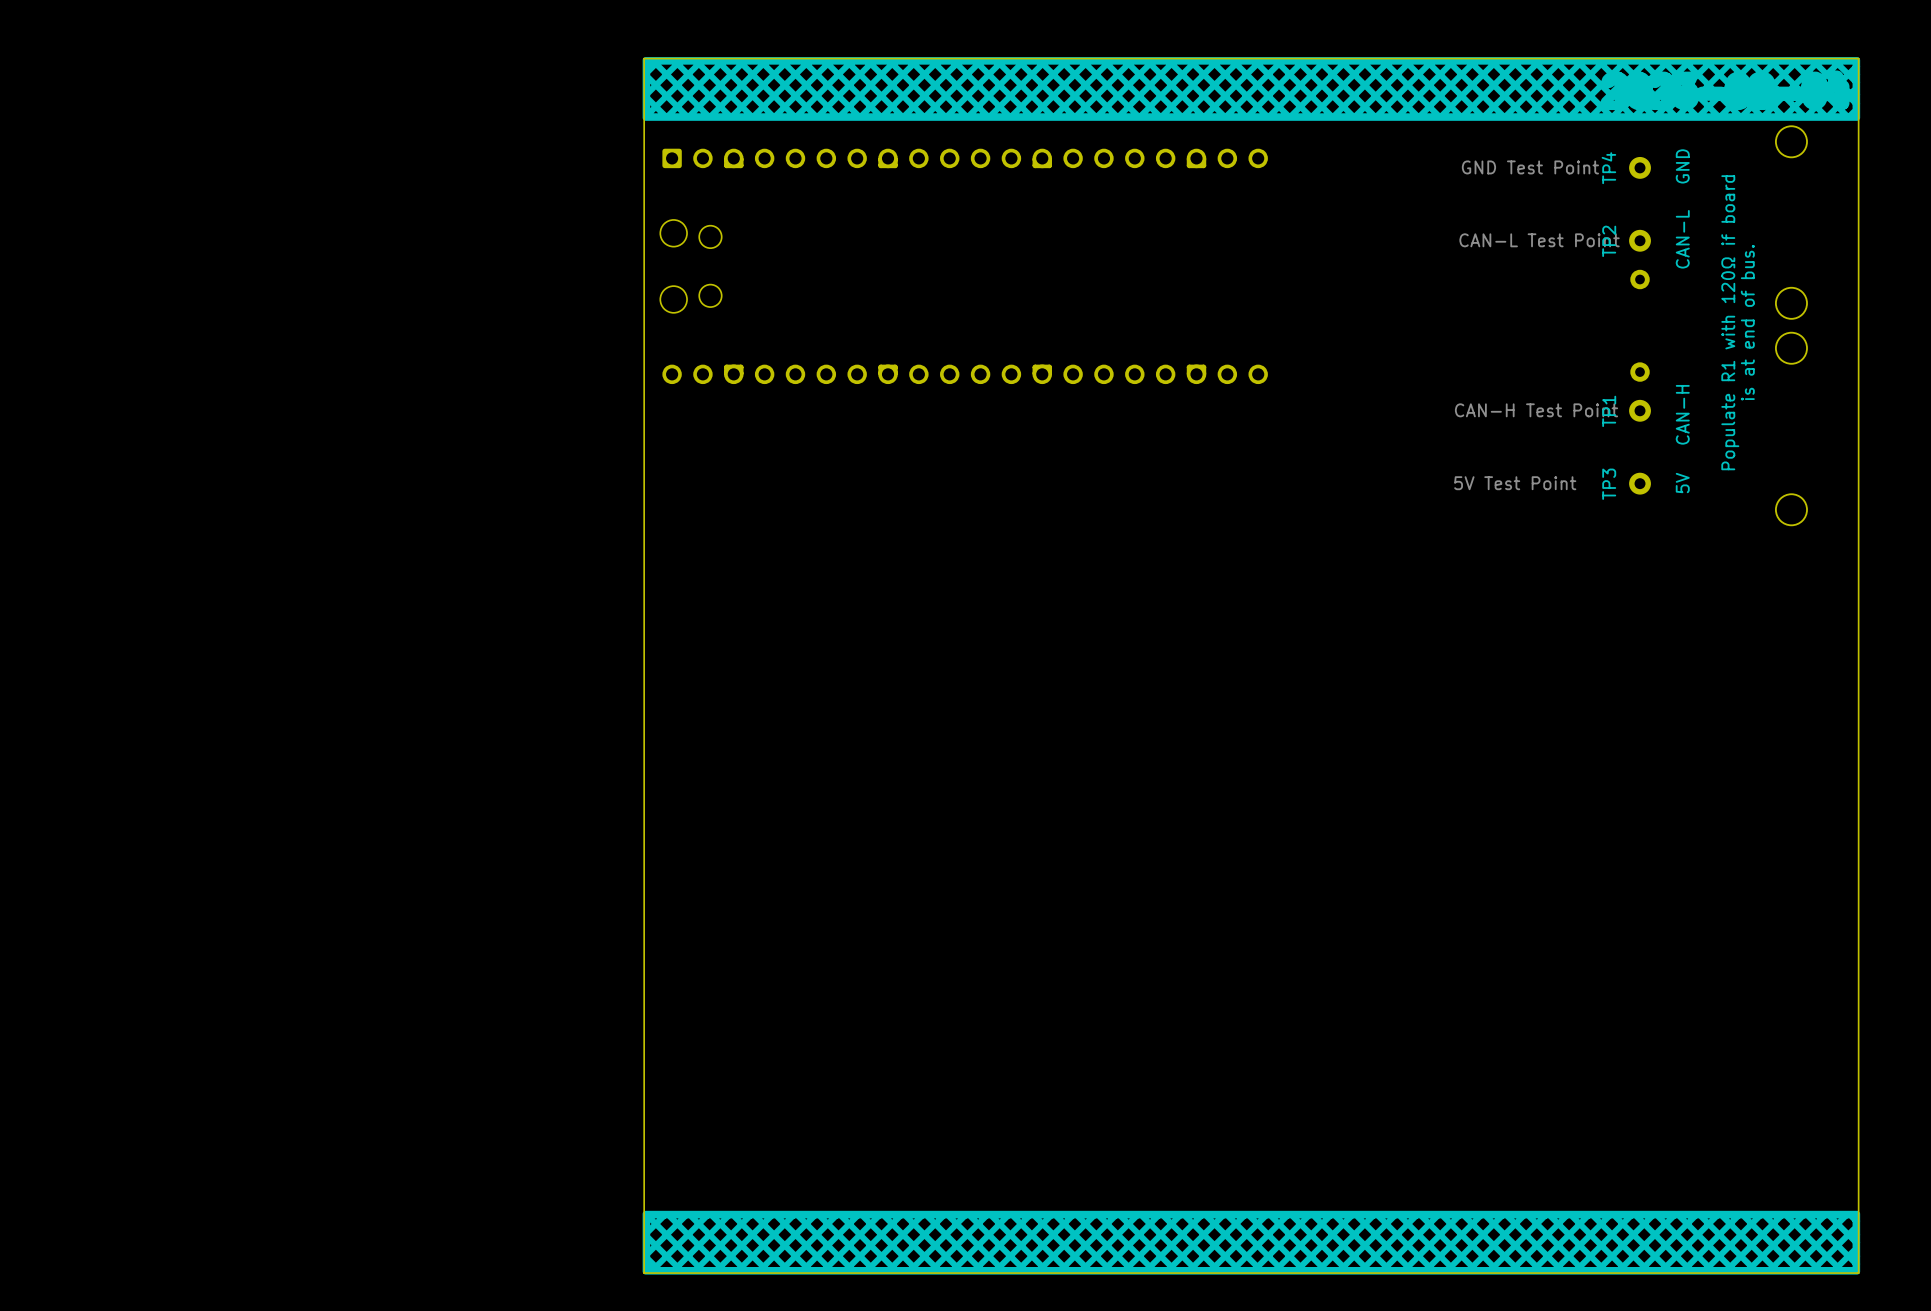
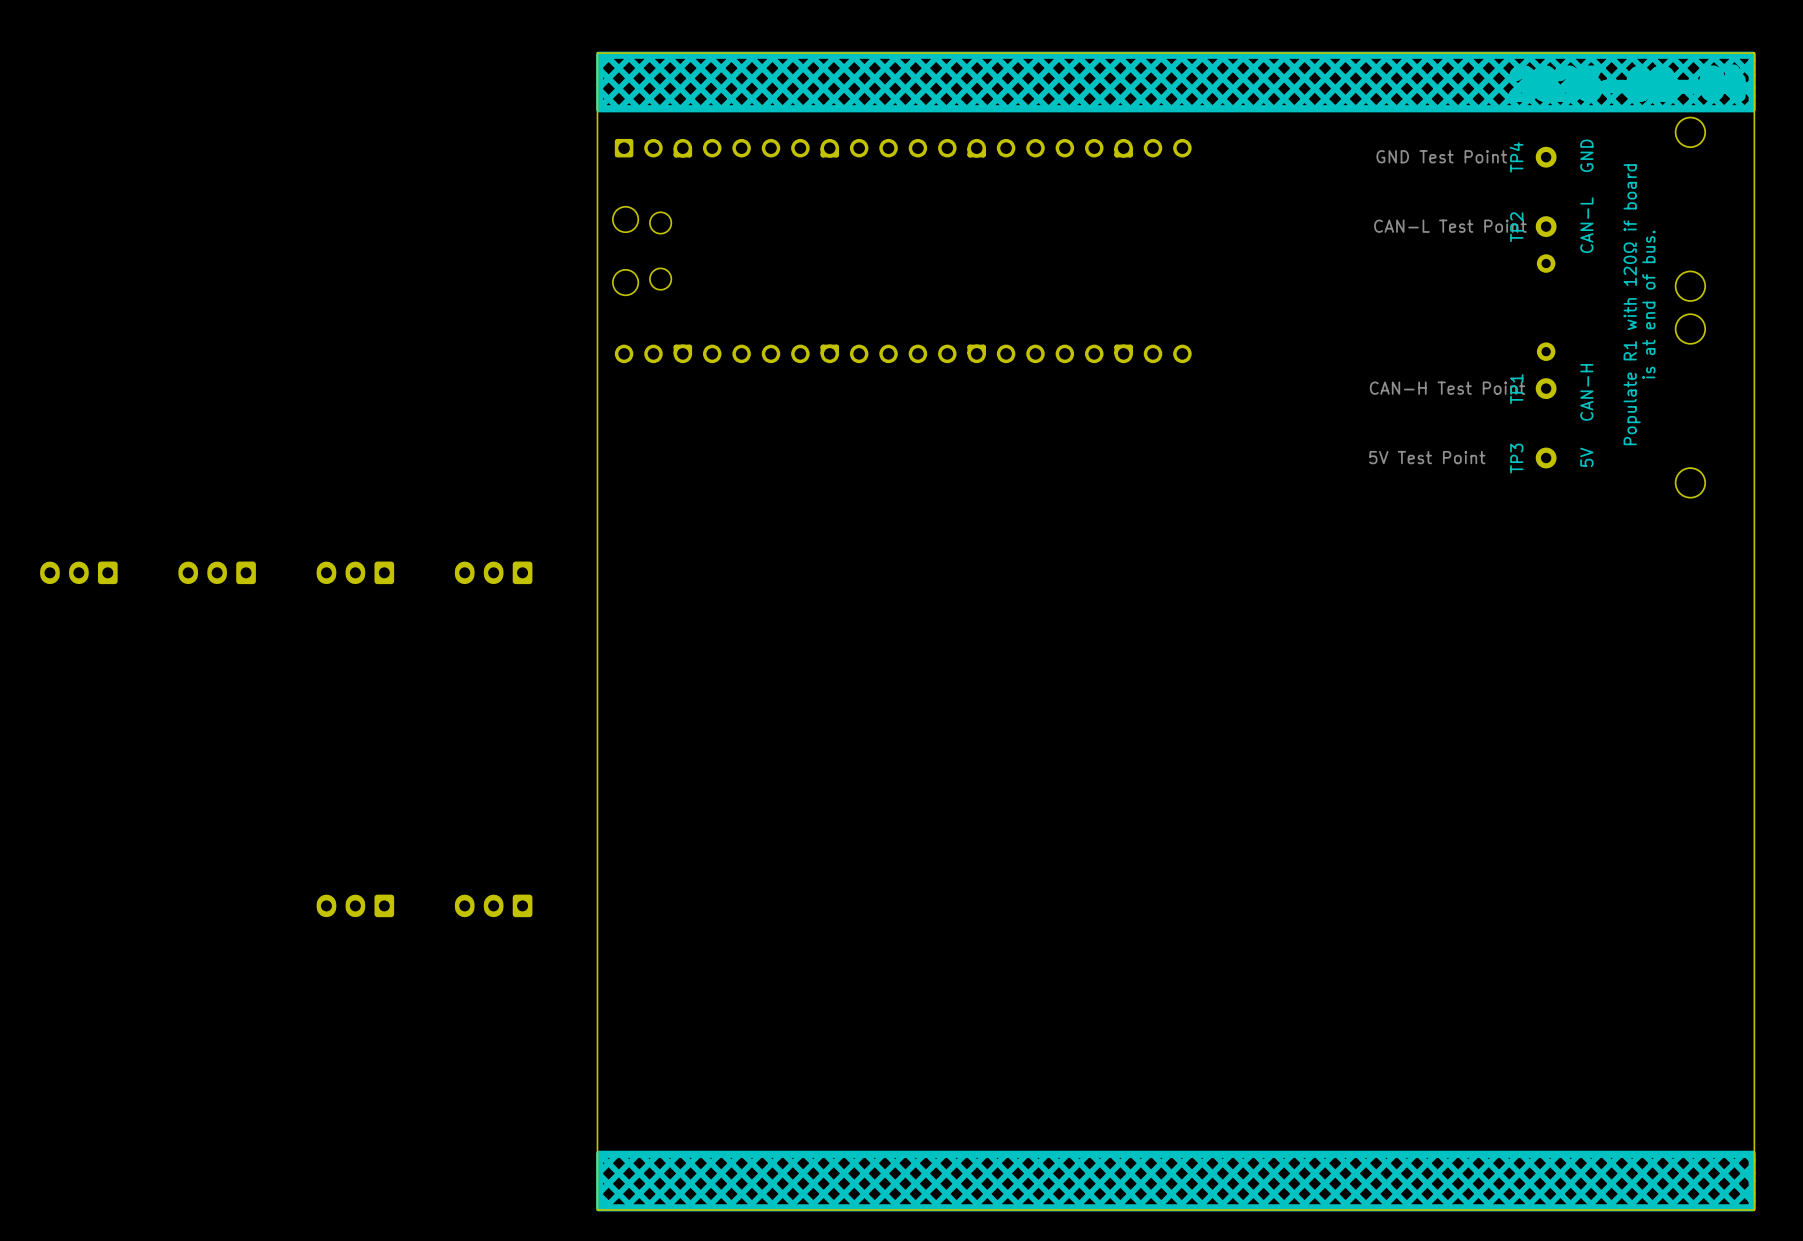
part: none -> (78, 572)
part: none -> (217, 572)
part: none -> (355, 572)
part: none -> (493, 572)
part: none -> (355, 905)
part: none -> (493, 905)

